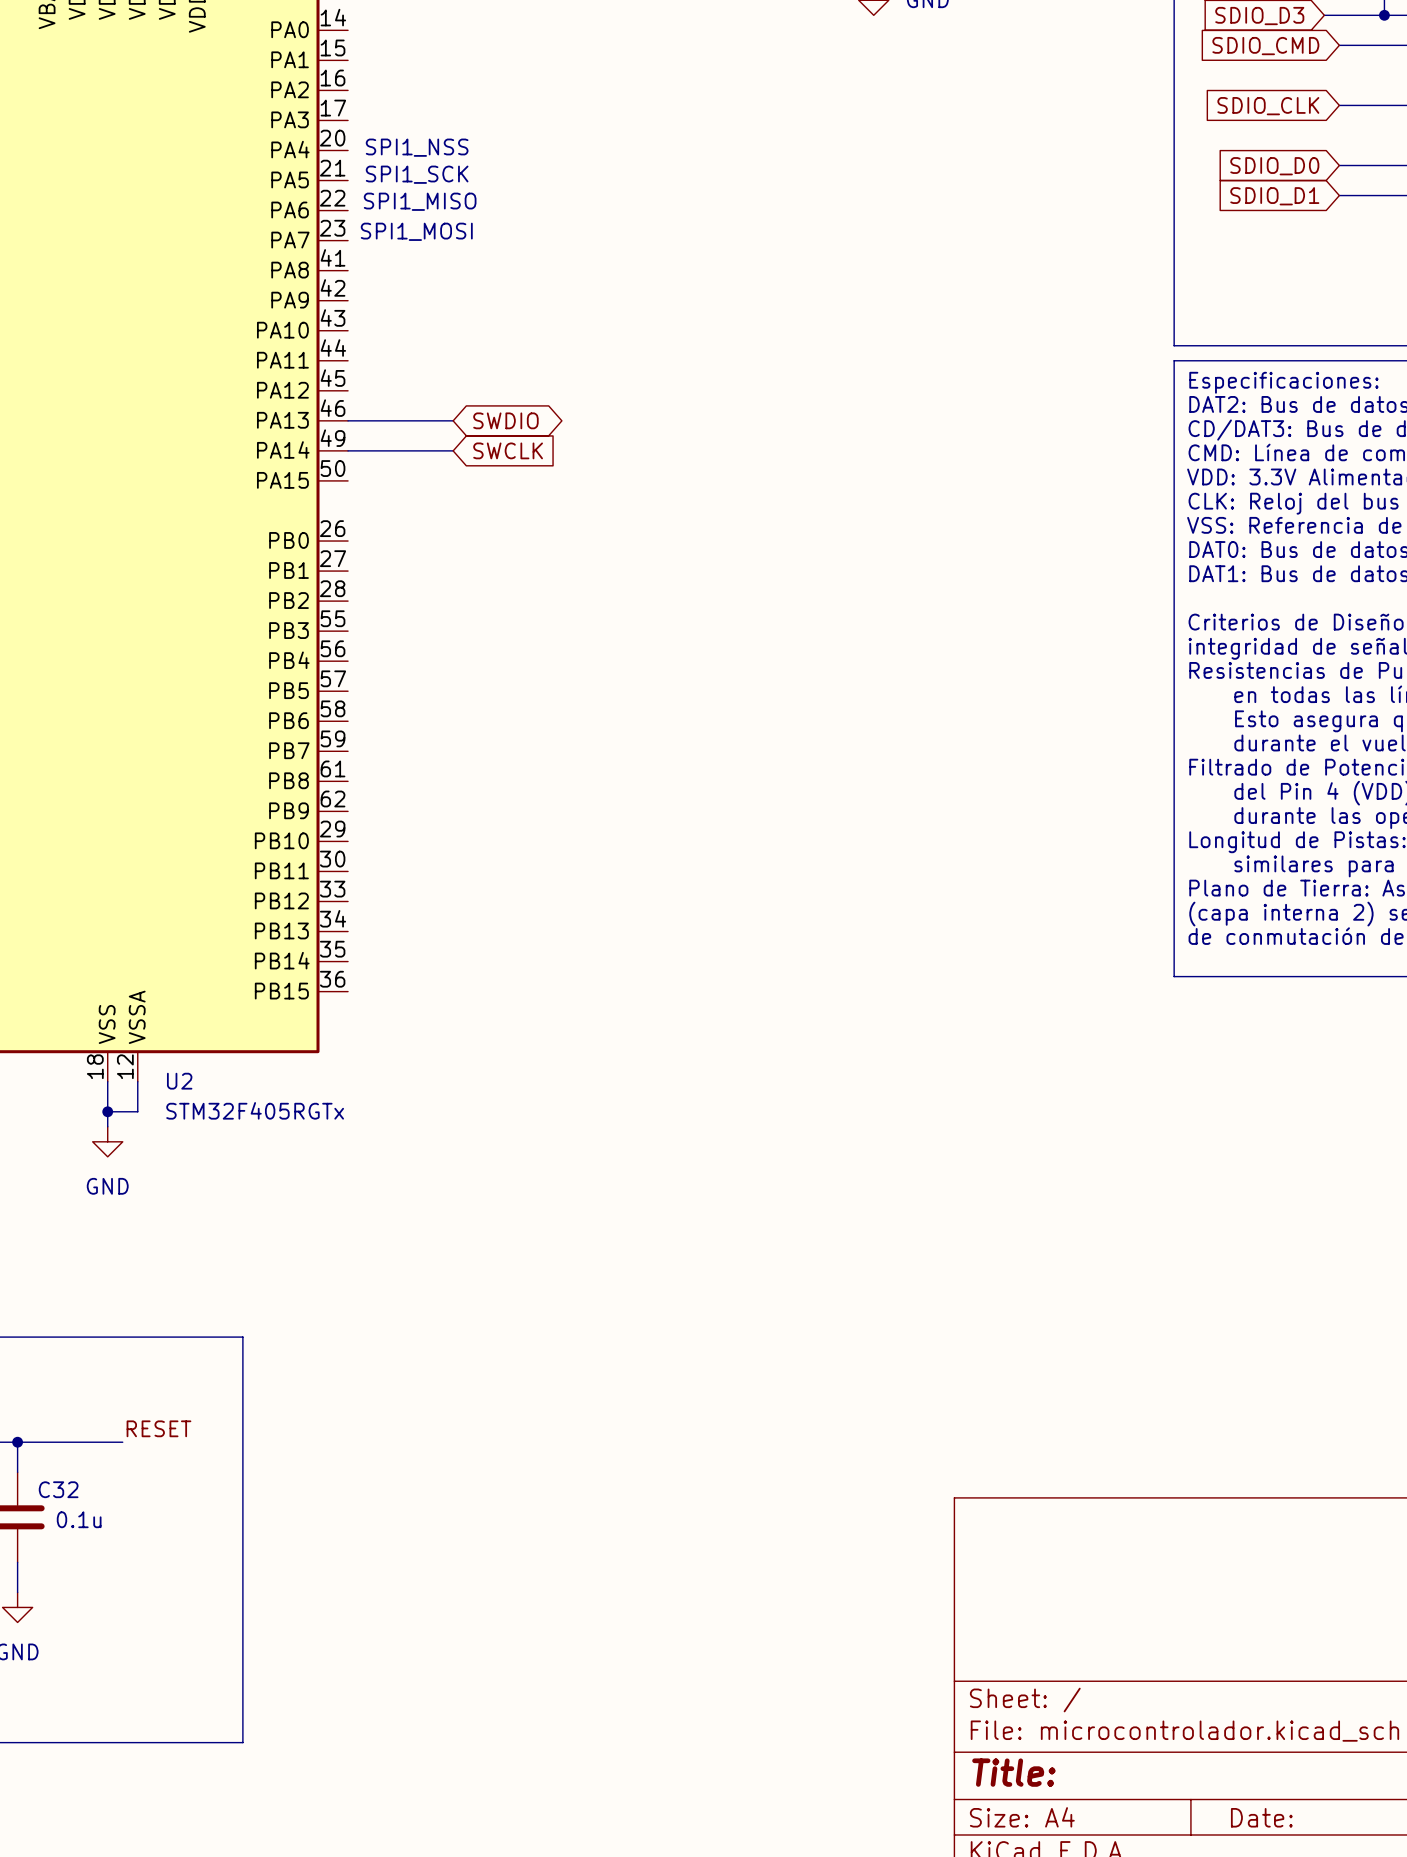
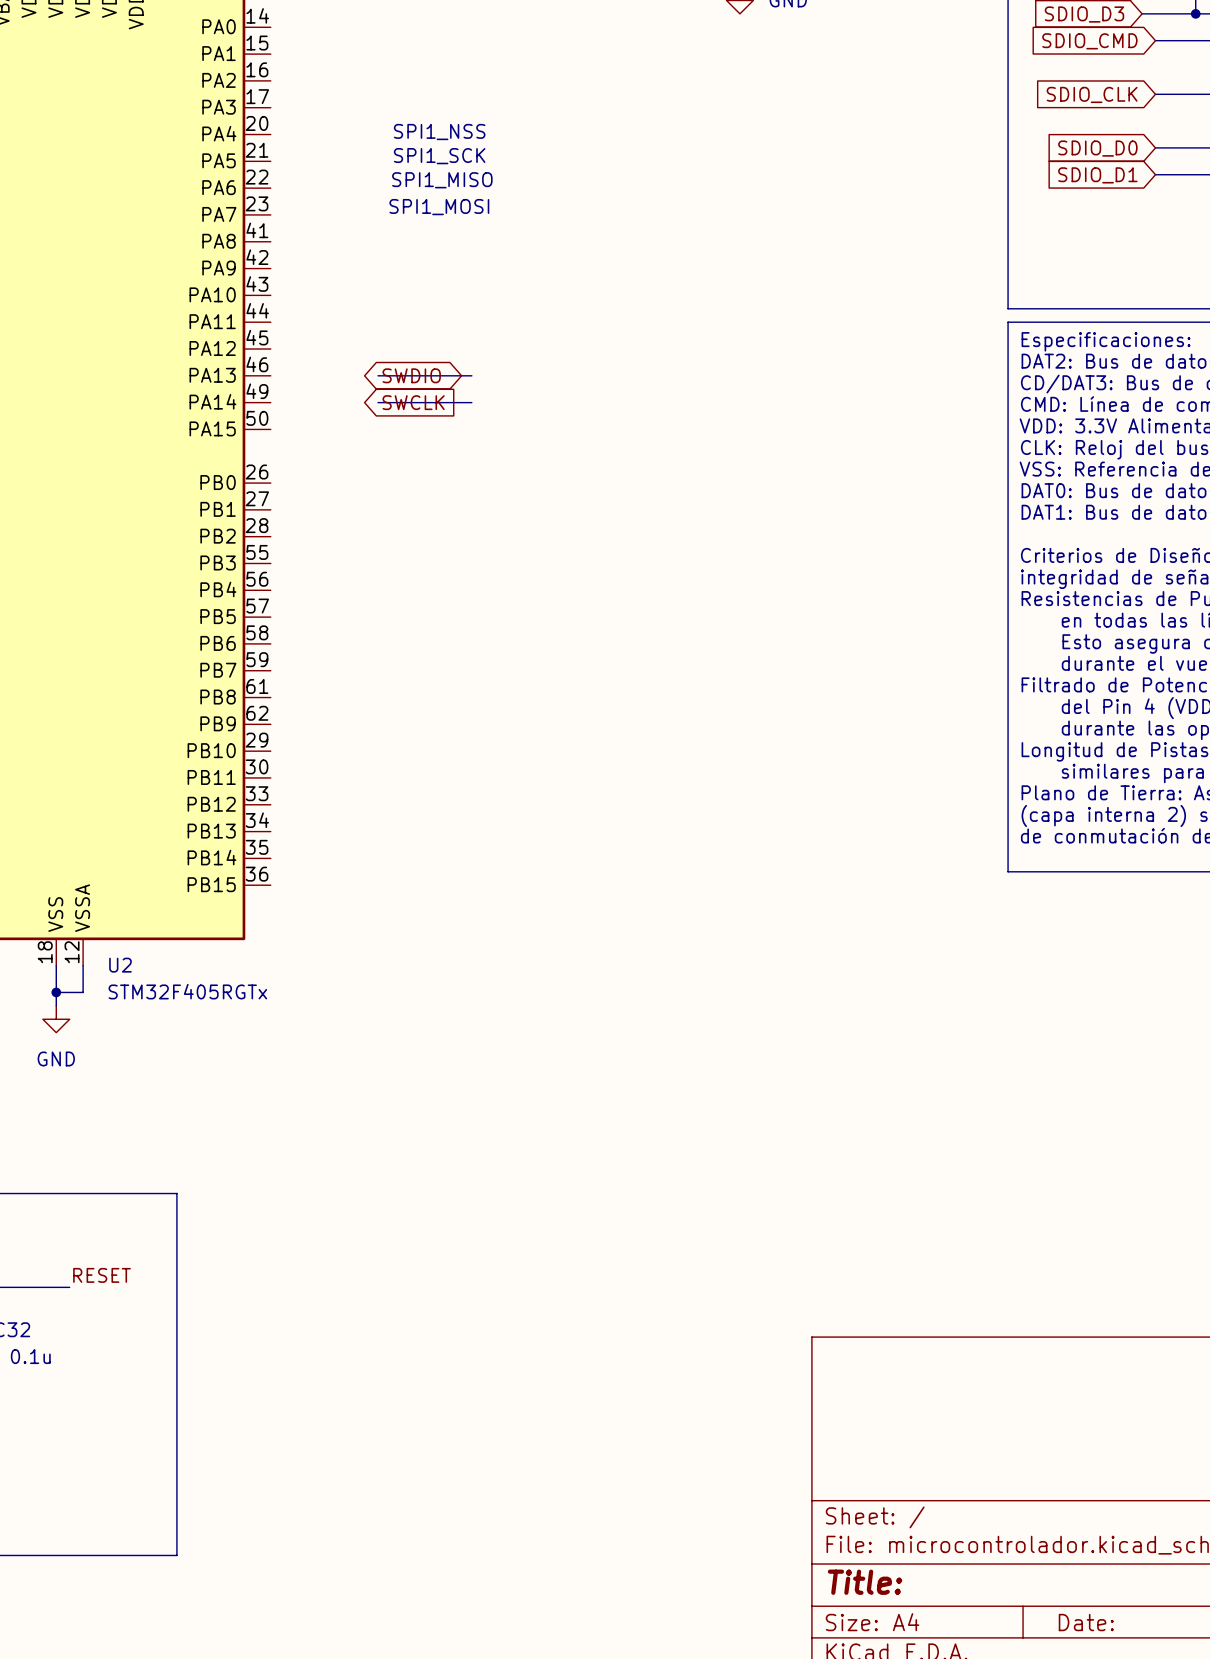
text position: SPI1_NSS (417, 147) -> SPI1_NSS (439, 132)
text position: SPI1_SCK (417, 174) -> SPI1_SCK (439, 156)
text position: SPI1_MISO (420, 201) -> SPI1_MISO (442, 180)
text position: SPI1_MOSI (416, 231) -> SPI1_MOSI (439, 207)
wire: (348, 420) (453, 420) -> (378, 375) (471, 375)
wire: (348, 450) (453, 450) -> (378, 402) (471, 402)

